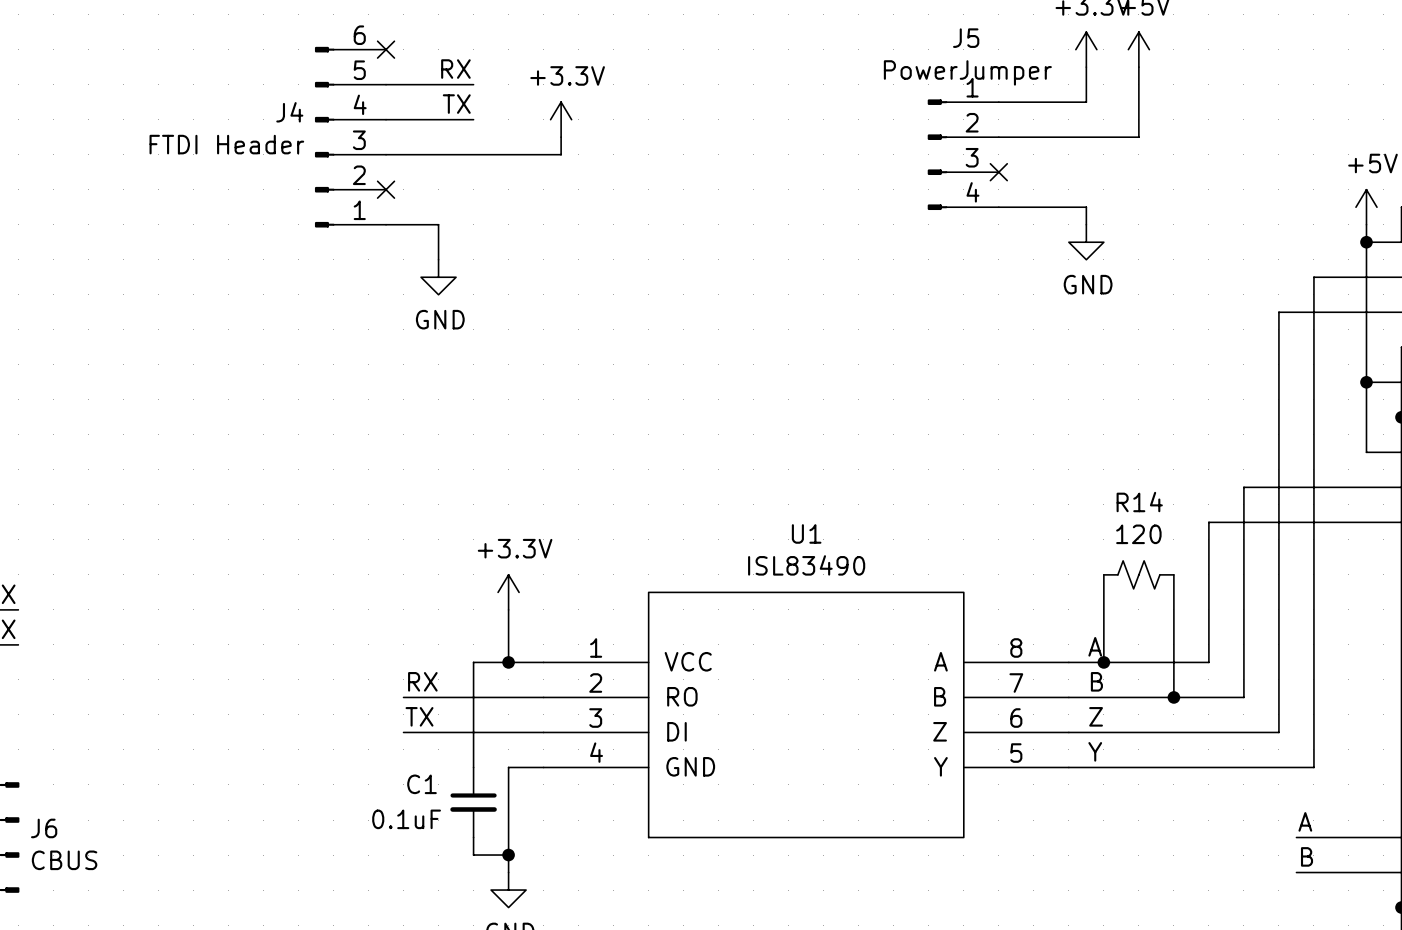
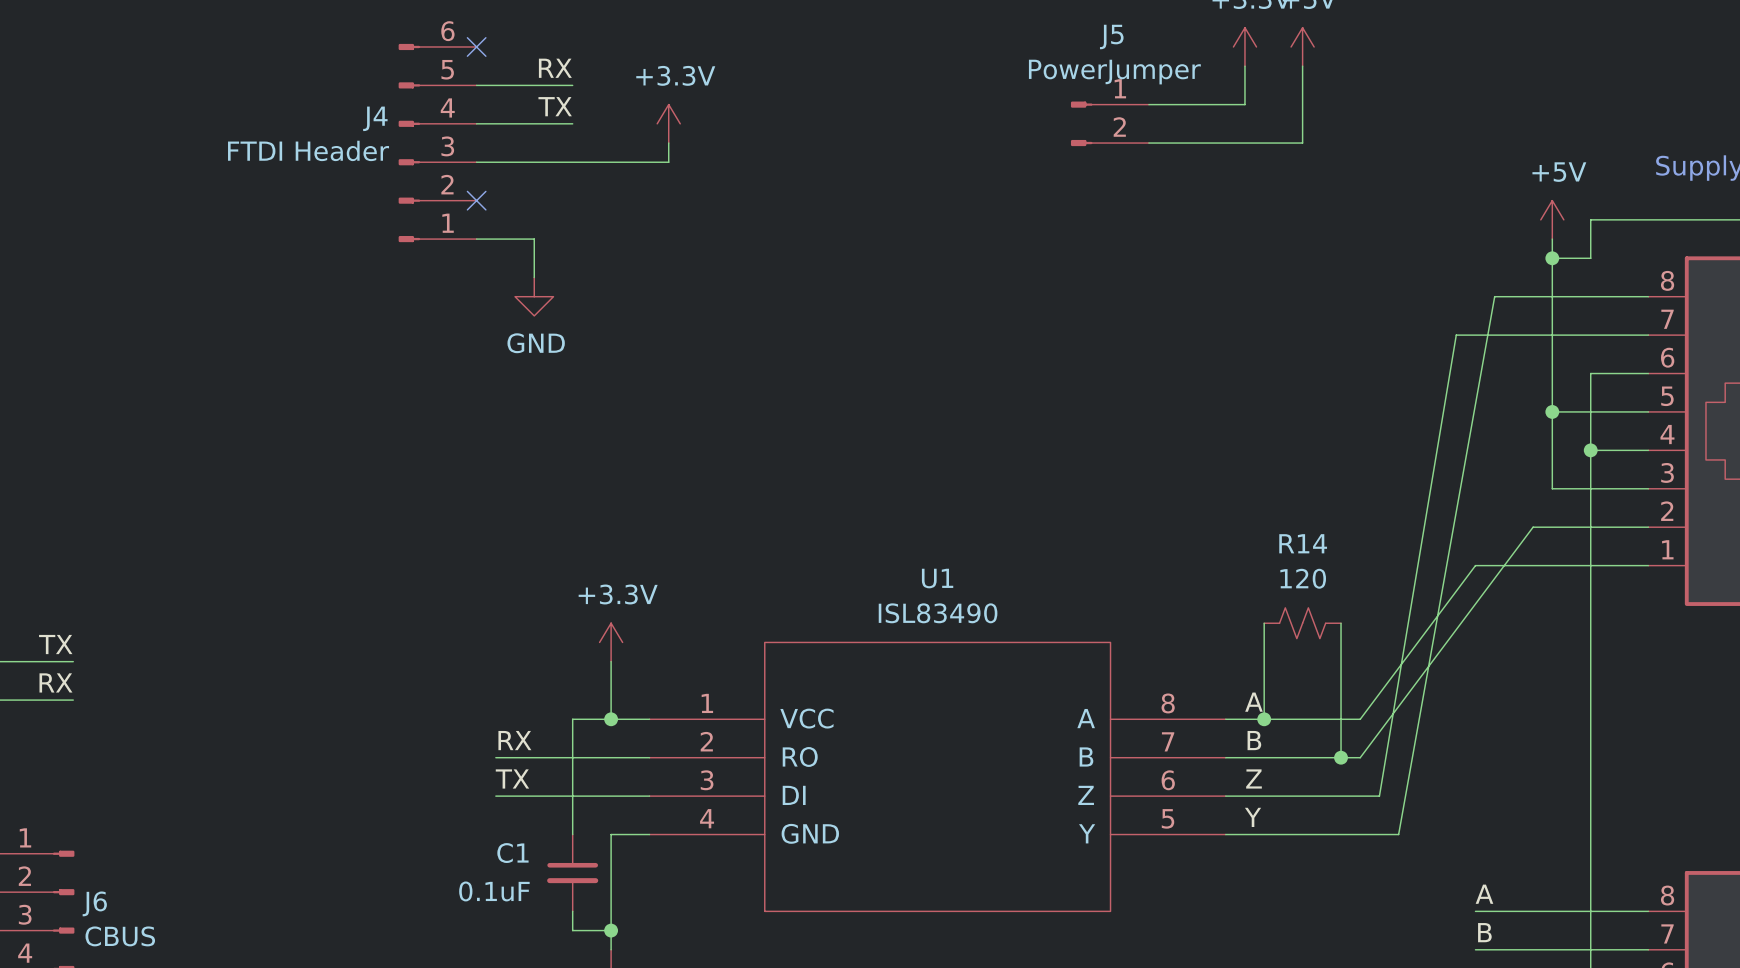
J5 symbol: [927, 99, 999, 211] -> [1070, 101, 1149, 147]
no-connect mark: (998, 172) -> none
wire: (998, 207) (1086, 207) (1086, 224) -> none
power symbol: GND (1086, 242) -> none
wire: (1313, 277) (1313, 767) (1226, 767) -> (1494, 296) (1398, 834)
wire: (1278, 312) (1278, 732) (1208, 732) -> (1456, 335) (1379, 796)
wire: (1348, 487) (1243, 487) (1243, 697) (1191, 697) -> (1533, 527) (1360, 757)
wire: (1296, 522) (1208, 522) (1208, 662) (1191, 662) -> (1475, 565) (1360, 719)

